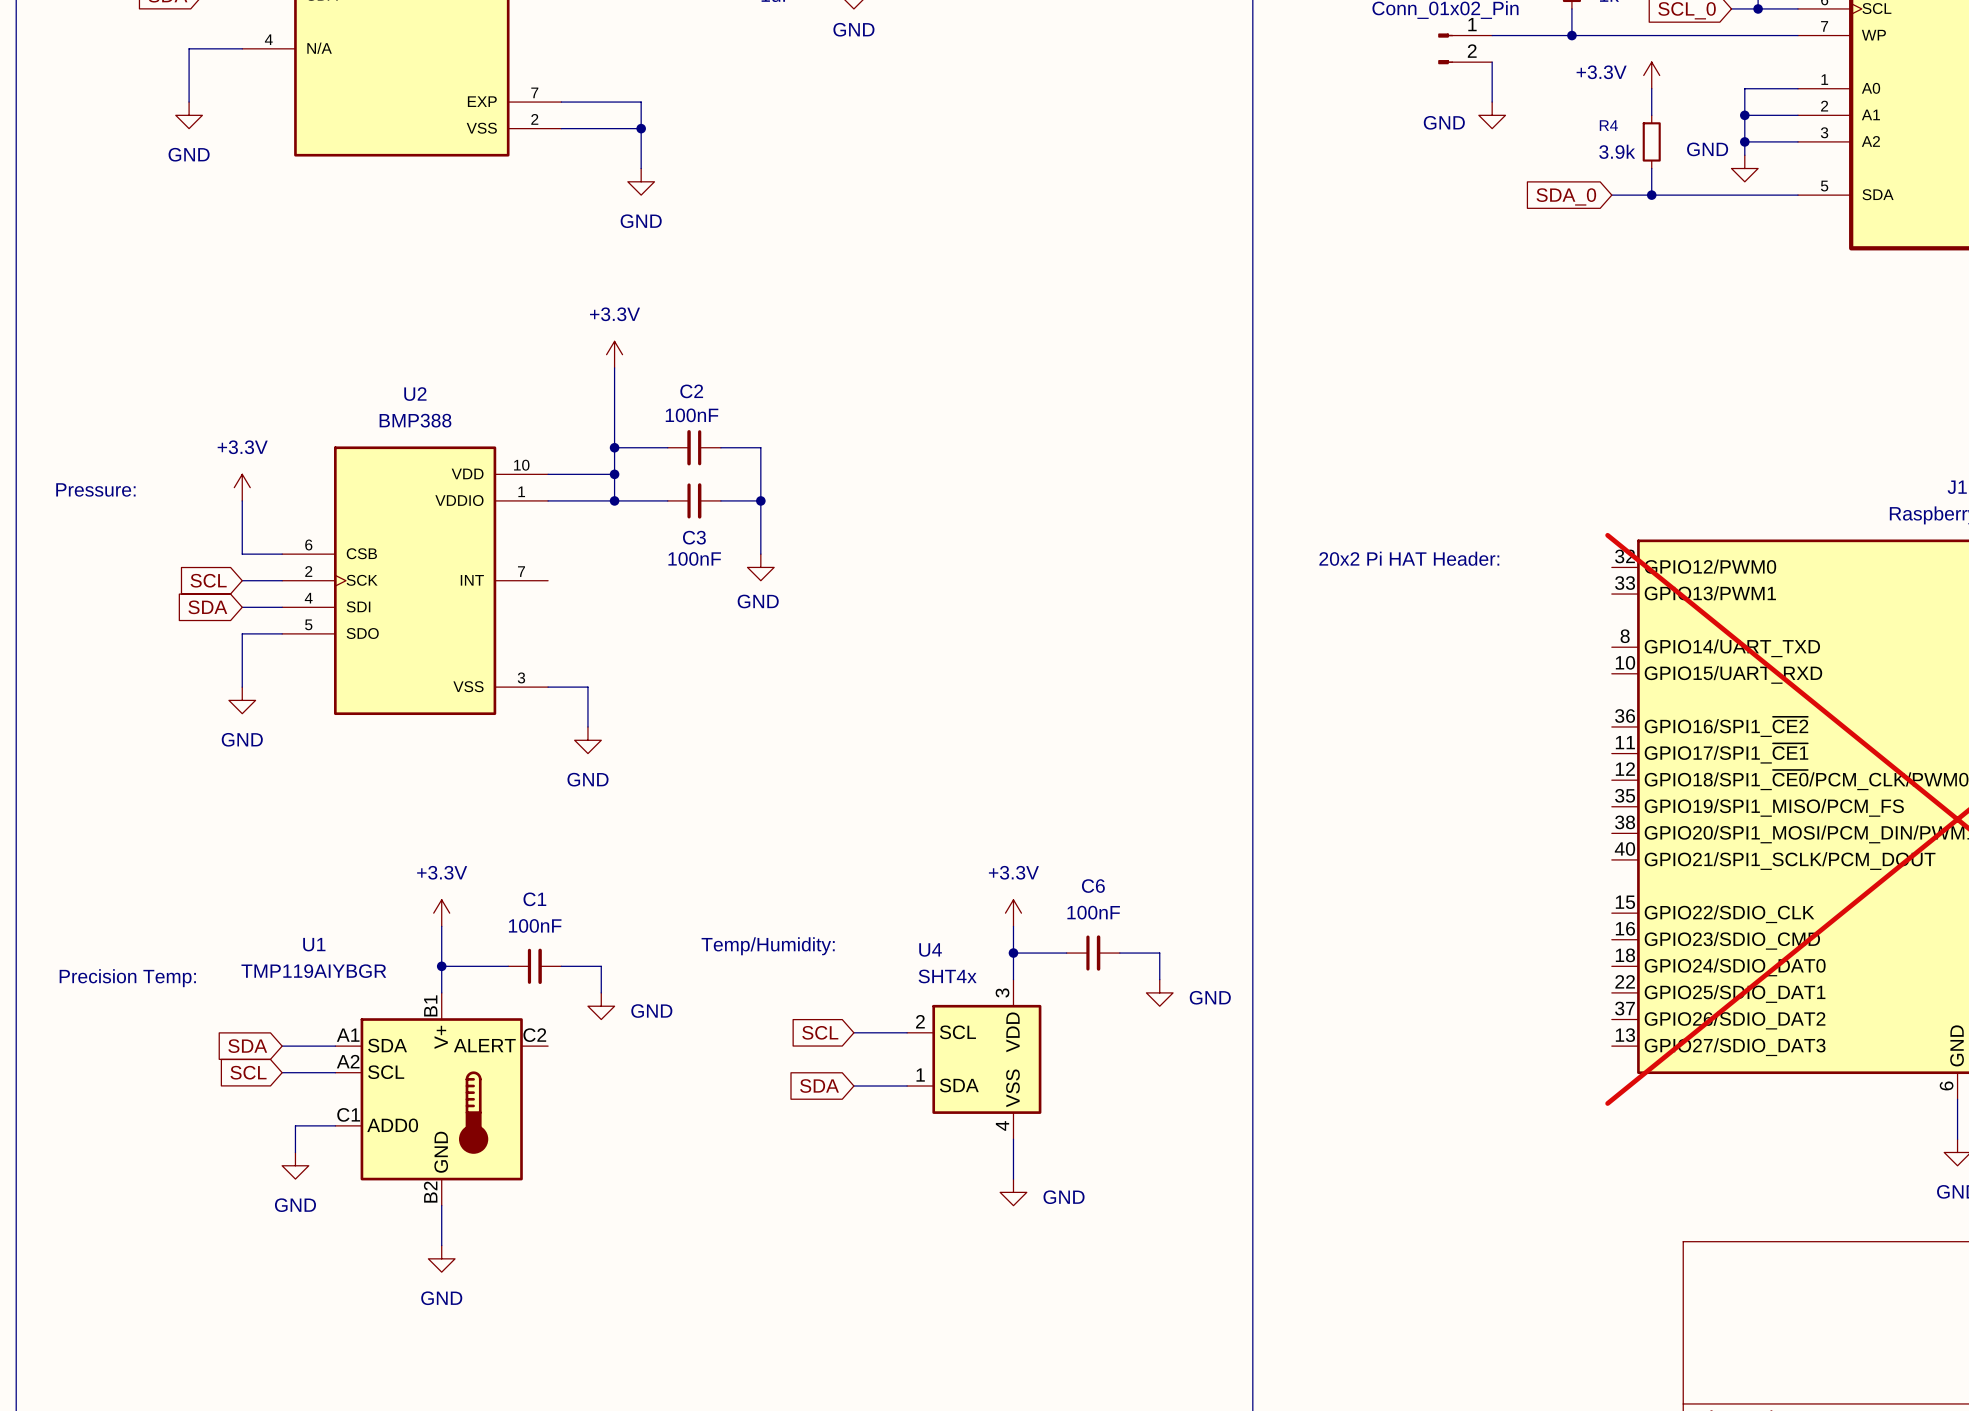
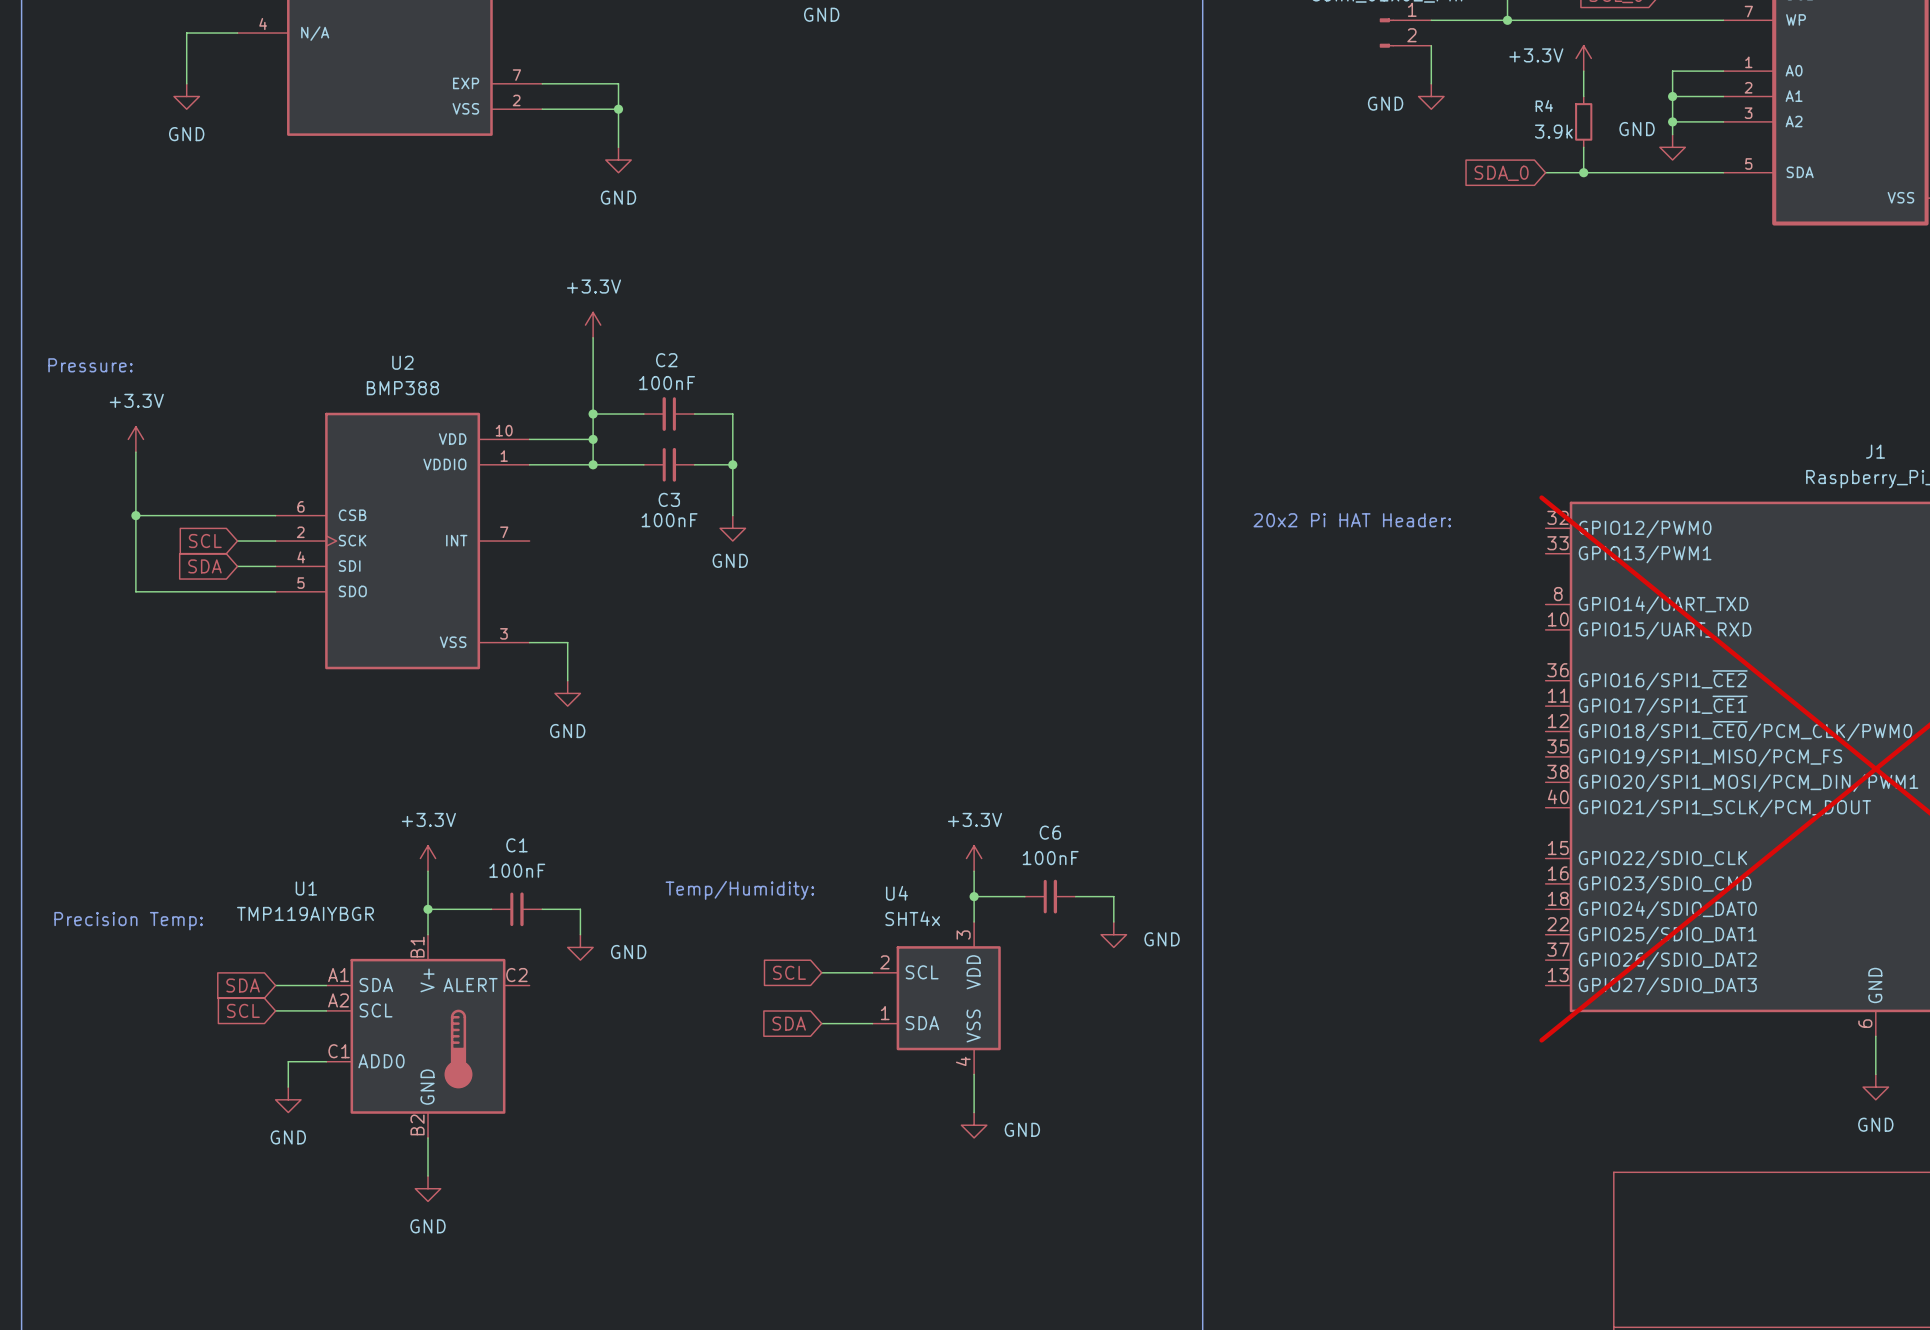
power symbol position: +3.3V (242, 487) -> +3.3V (135, 439)
text position: Pressure: (95, 489) -> Pressure: (90, 365)
wire: (242, 500) (242, 554) -> (135, 515) (237, 515)
junction: none -> (135, 515)
wire: (242, 633) (242, 687) -> (237, 591) (135, 591) (135, 452)
power symbol: GND (242, 700) -> none

